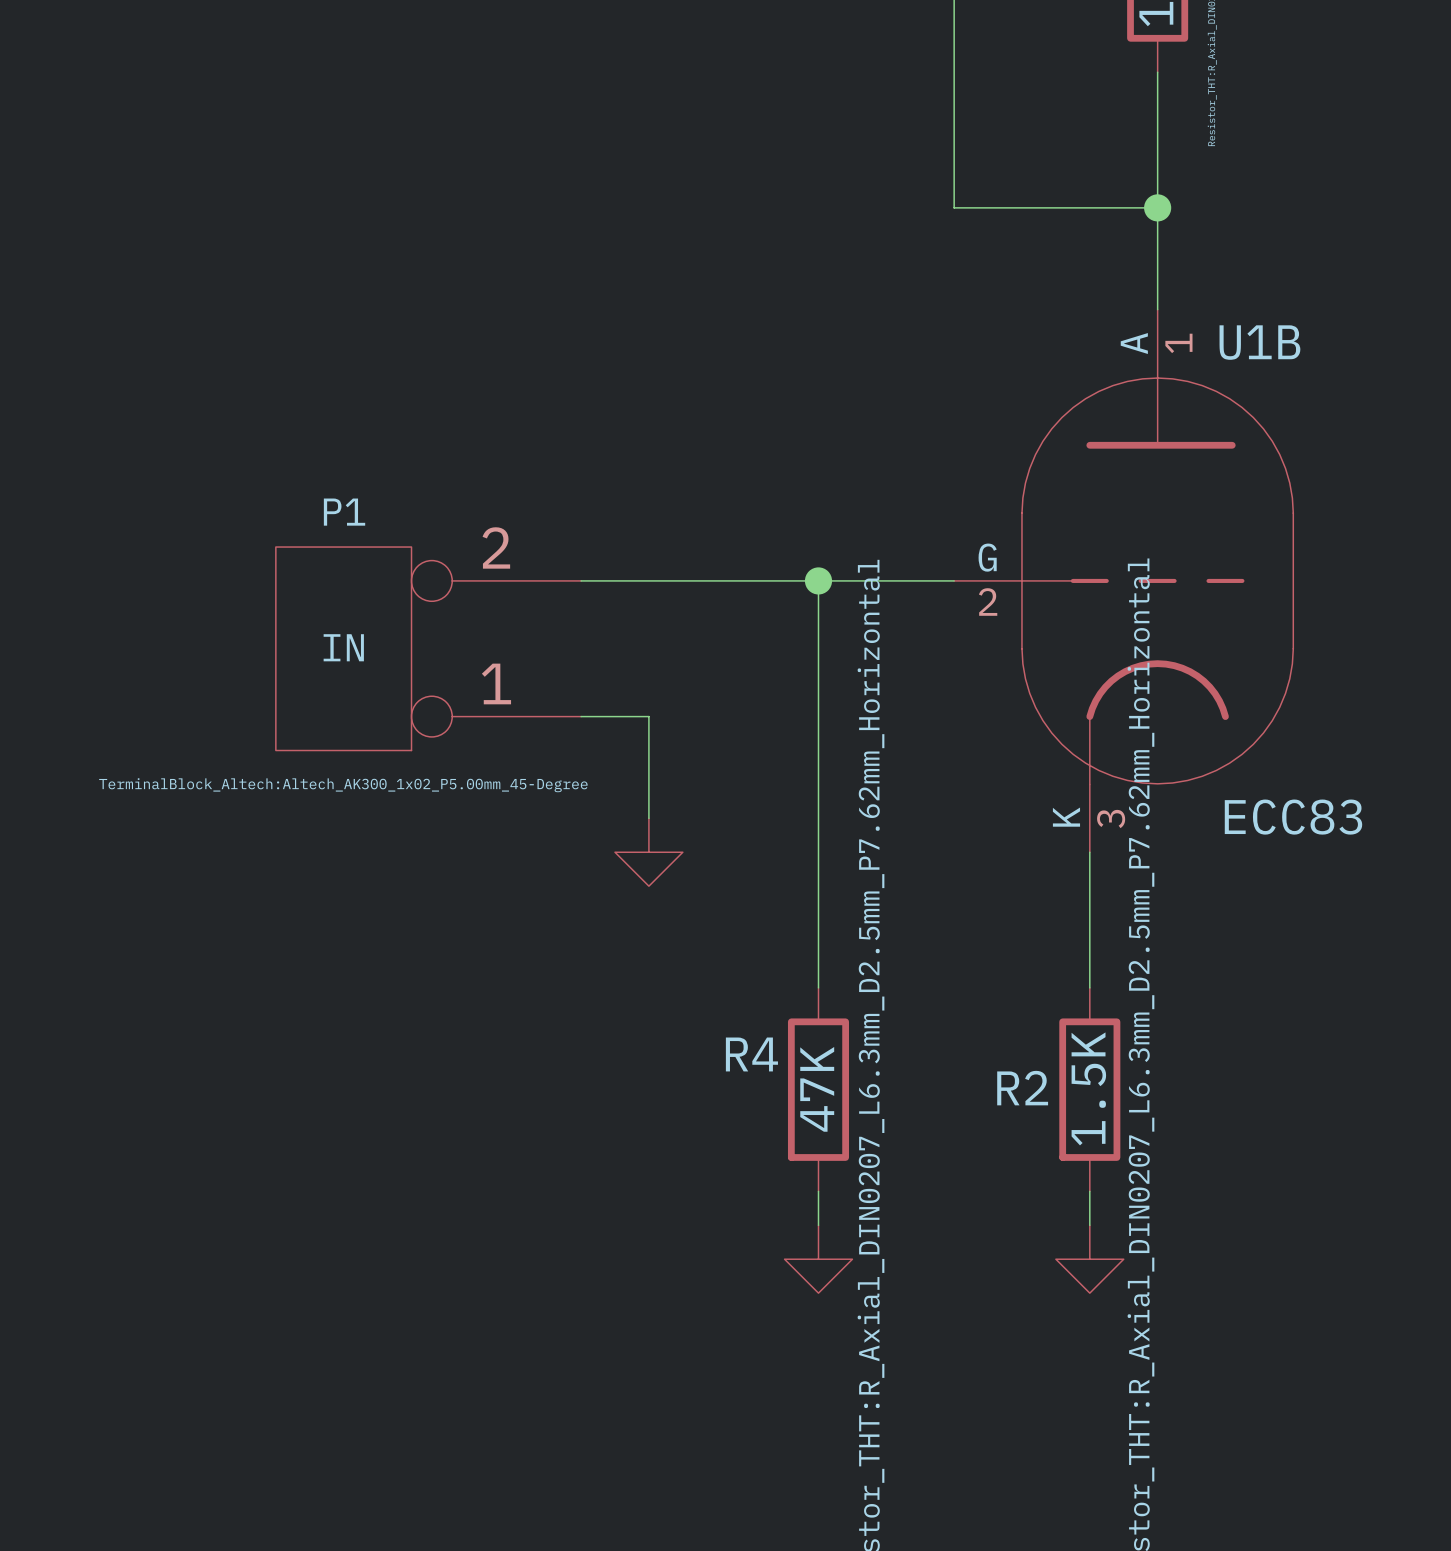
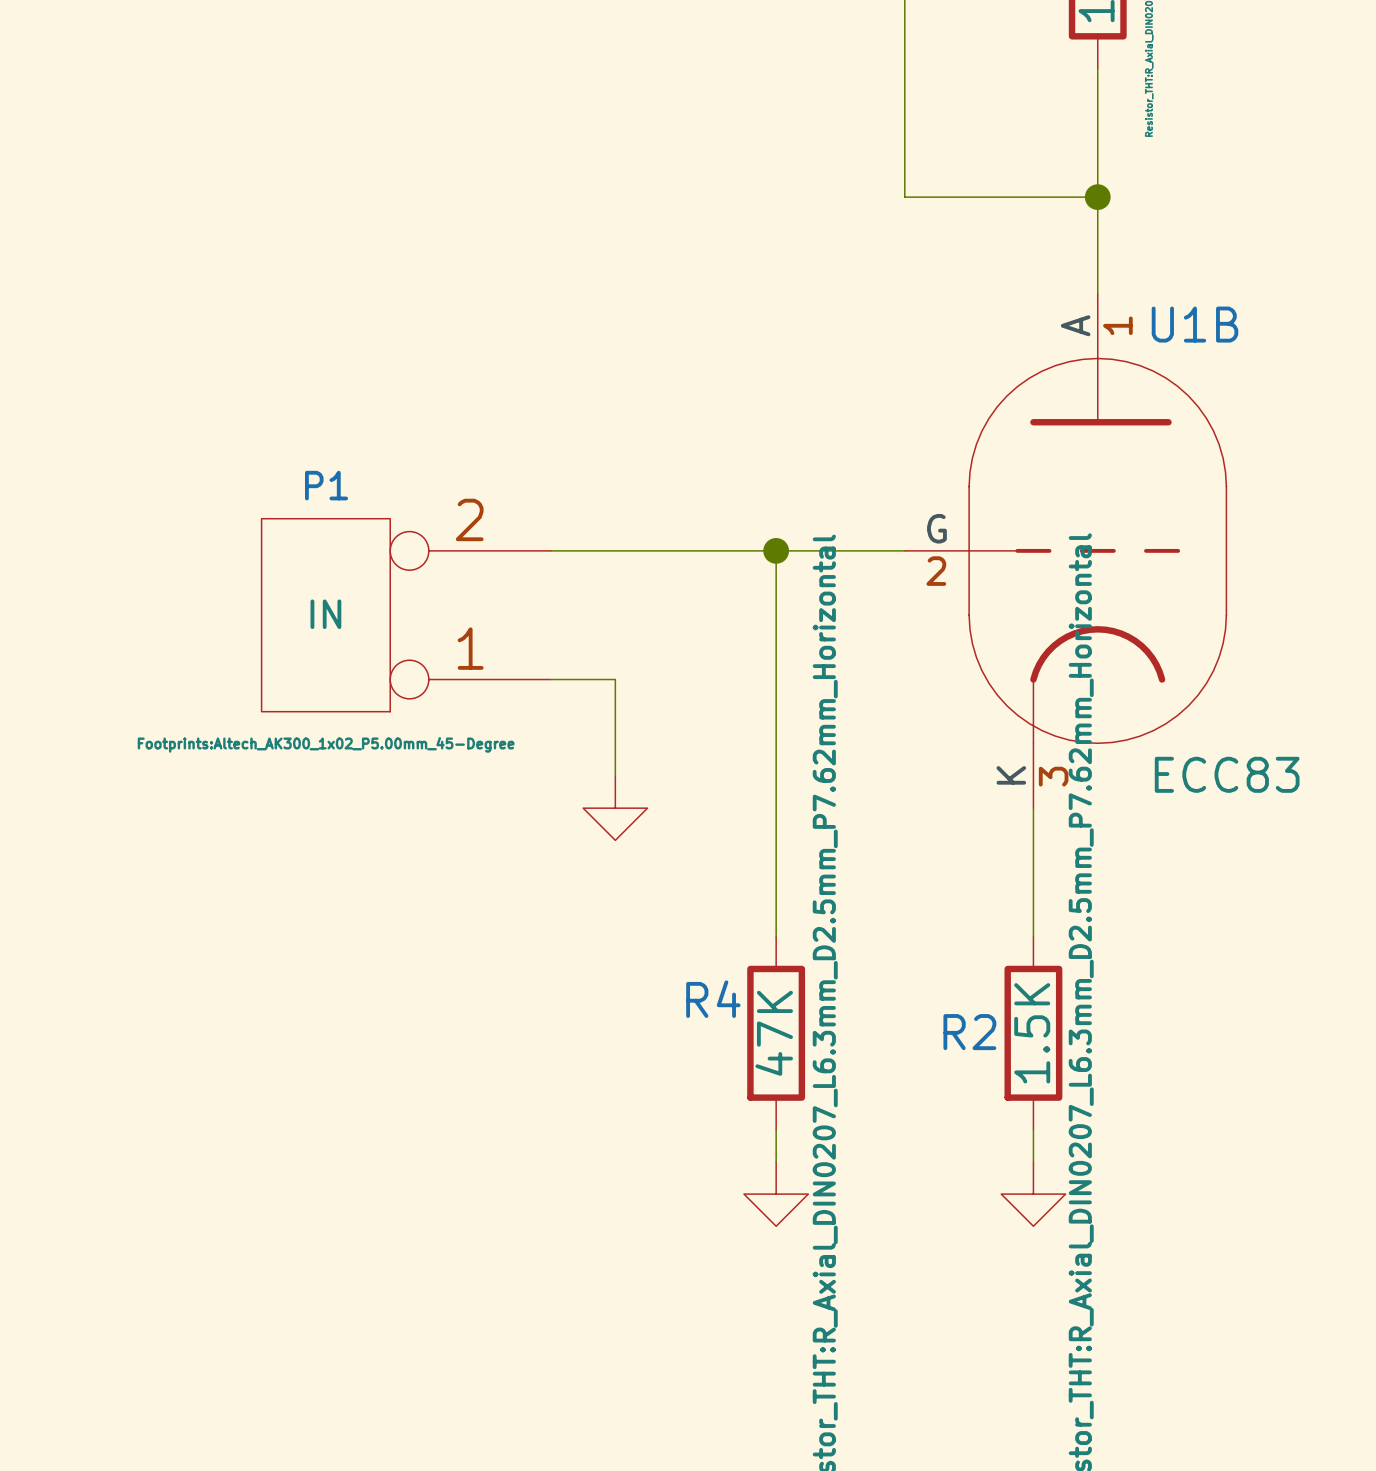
P1 text: TerminalBlock_Altech:Altech_AK300_1x02_P5.00mm_45-Degree (343, 785) -> Footprints:Altech_AK300_1x02_P5.00mm_45-Degree (326, 744)

